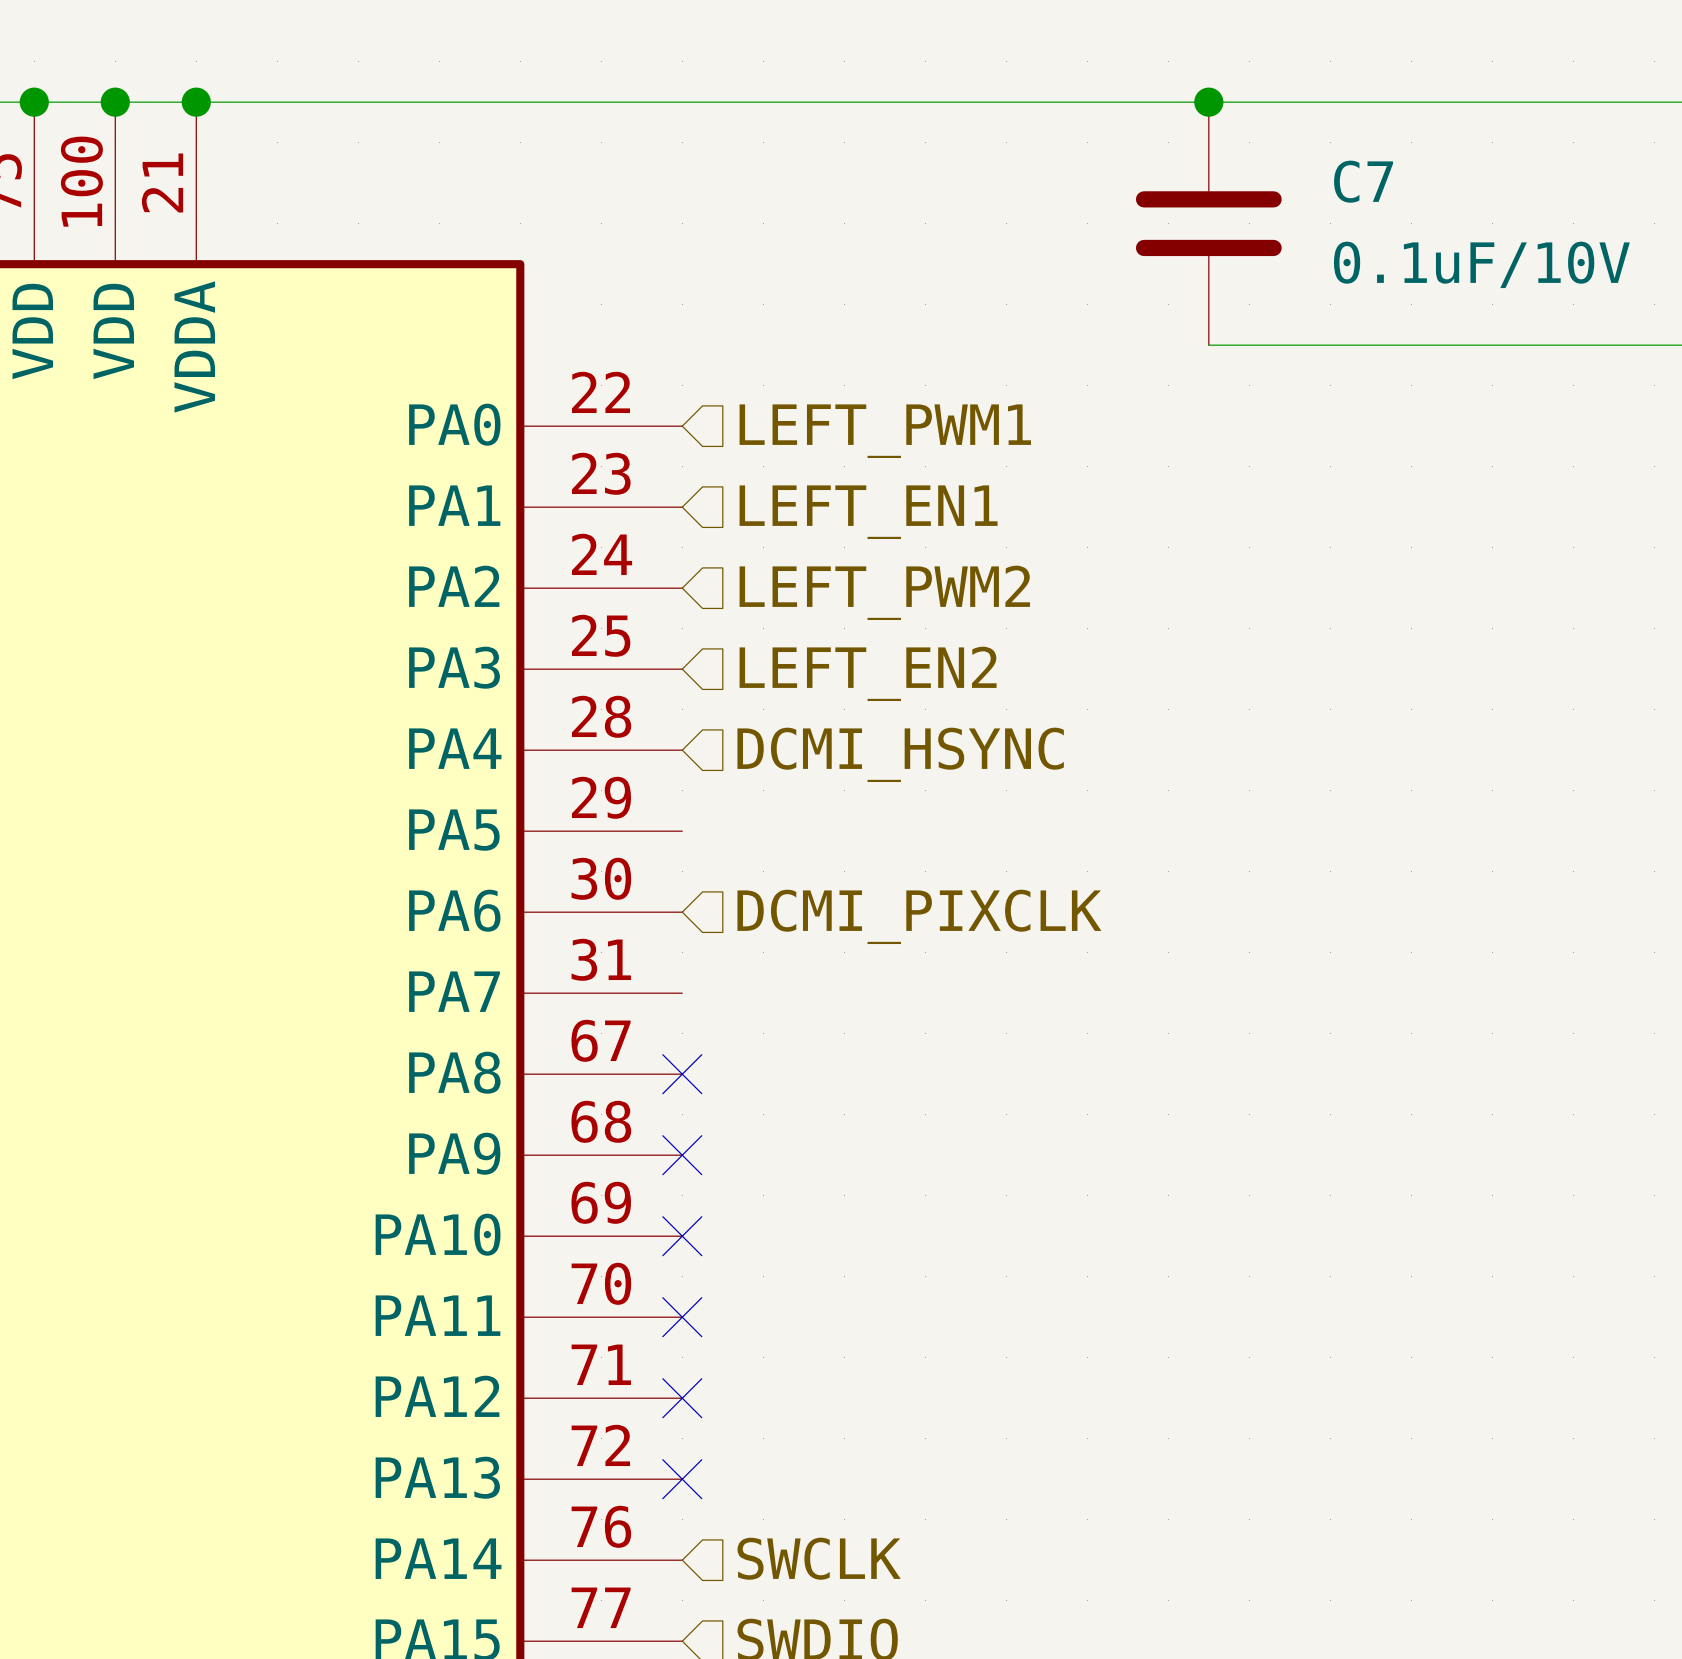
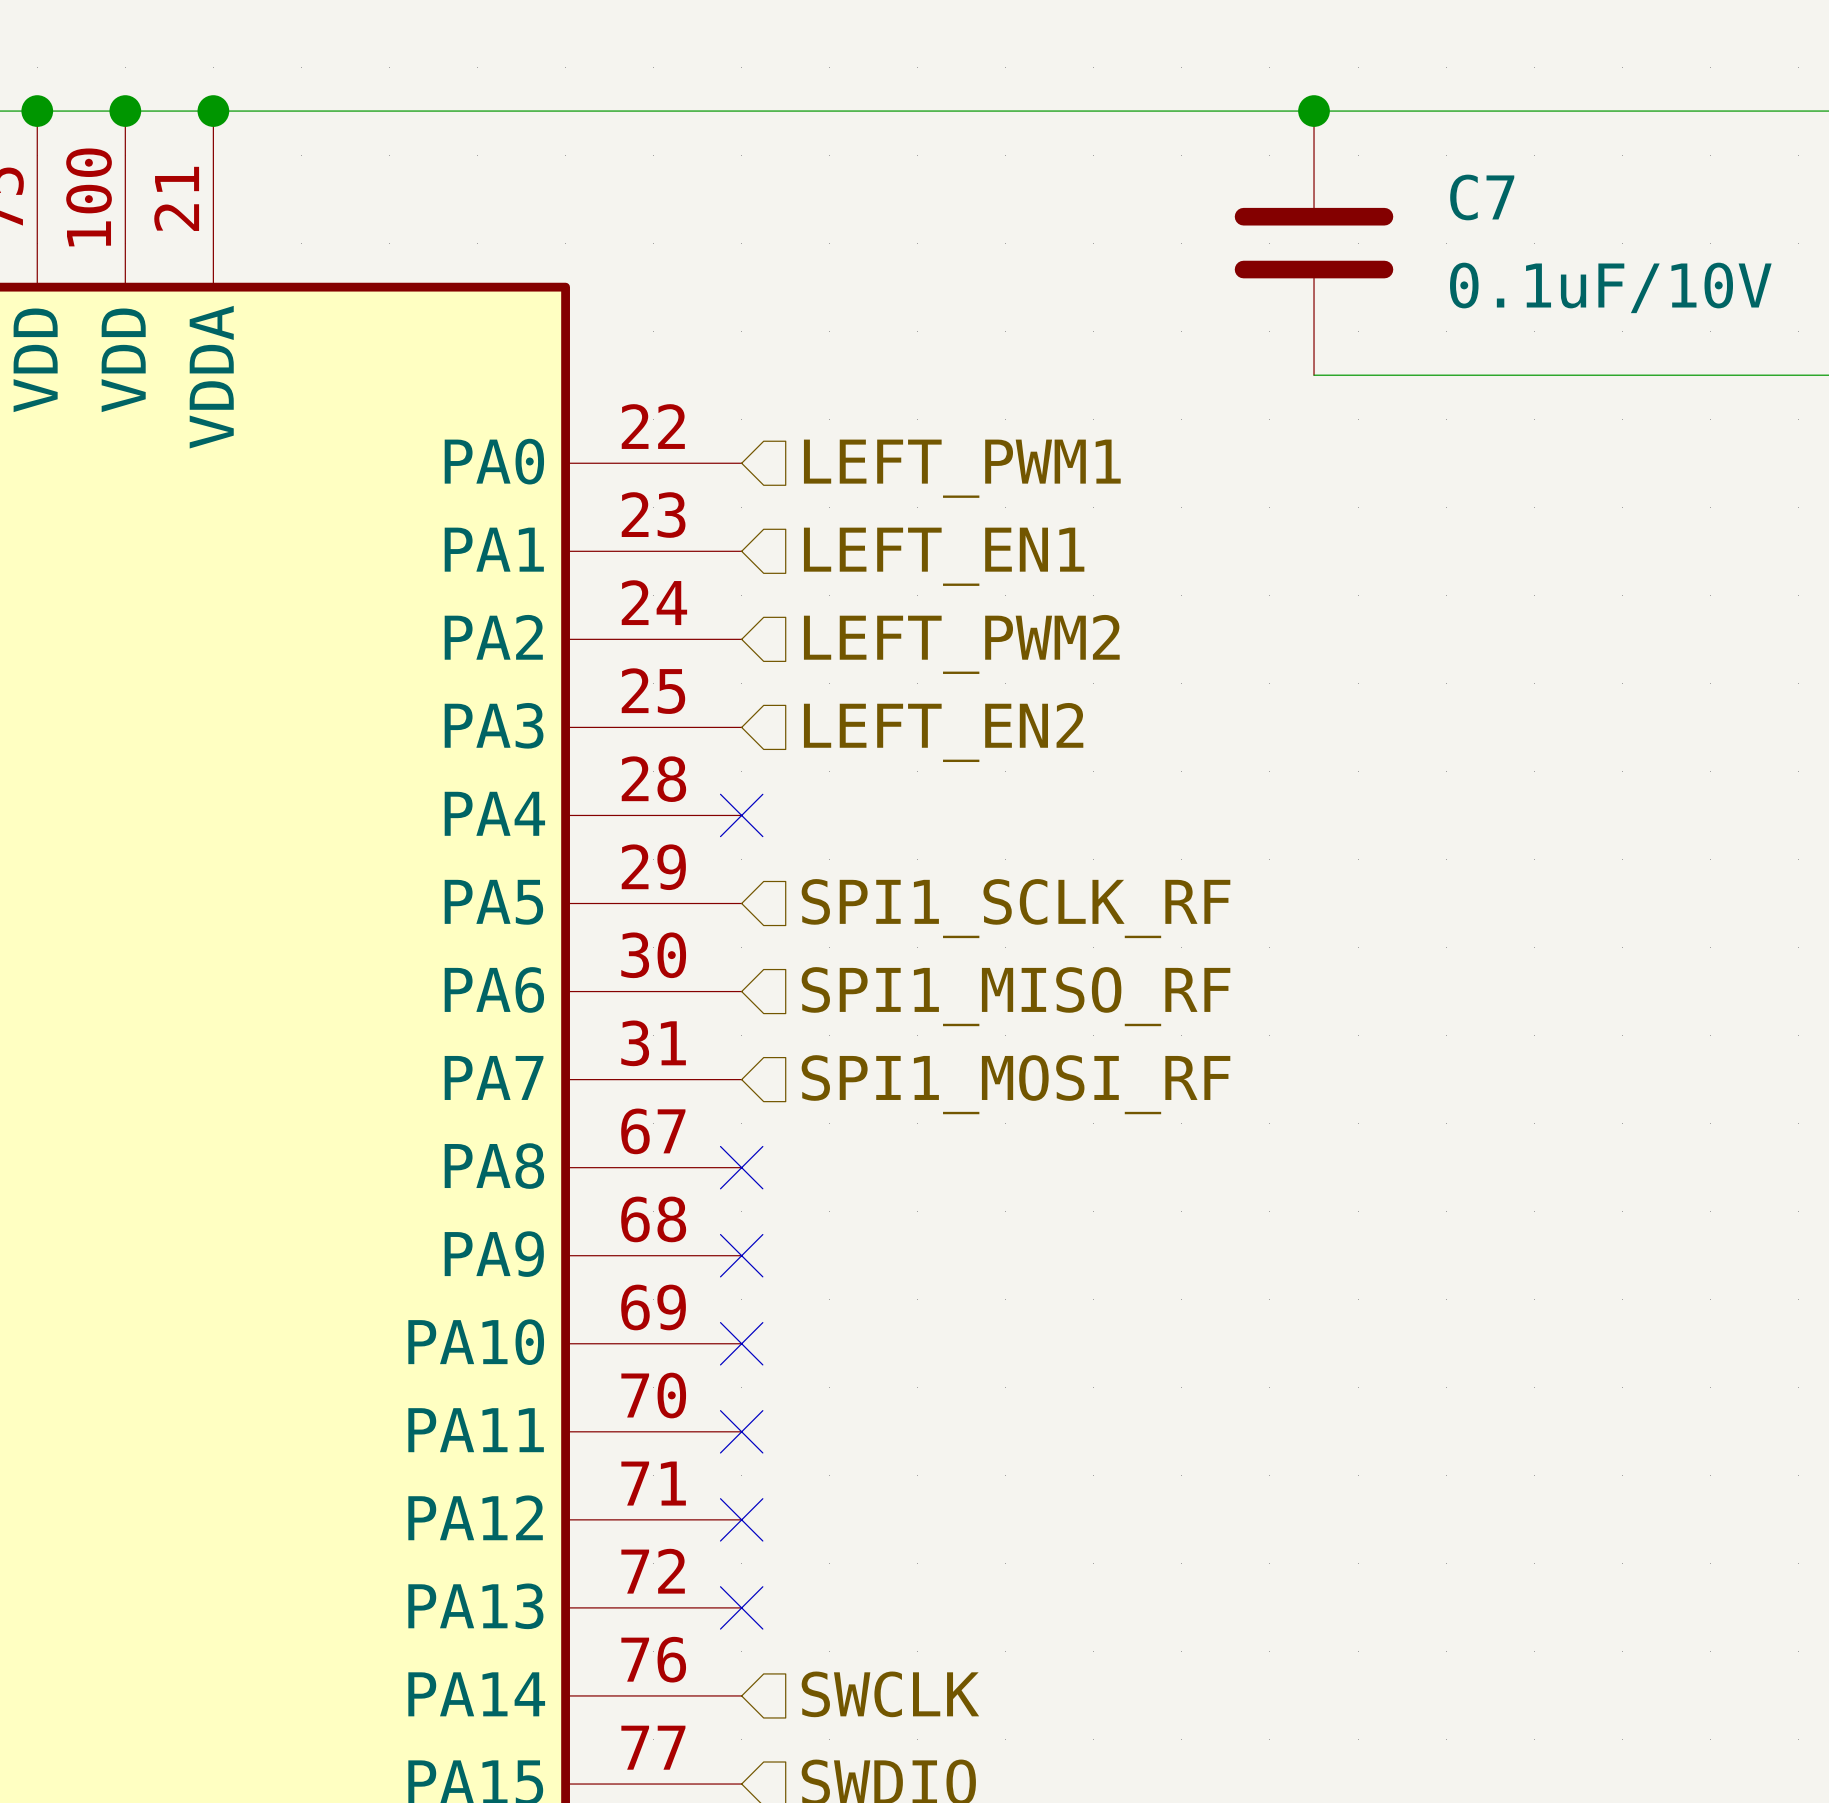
no-connect mark: none -> (741, 815)
hierarchical label: DCMI_HSYNC (900, 754) -> none
hierarchical label: none -> SPI1_SCLK_RF (1015, 908)
hierarchical label: DCMI_PIXCLK (919, 916) -> SPI1_MISO_RF (1015, 996)
hierarchical label: none -> SPI1_MOSI_RF (1015, 1084)

